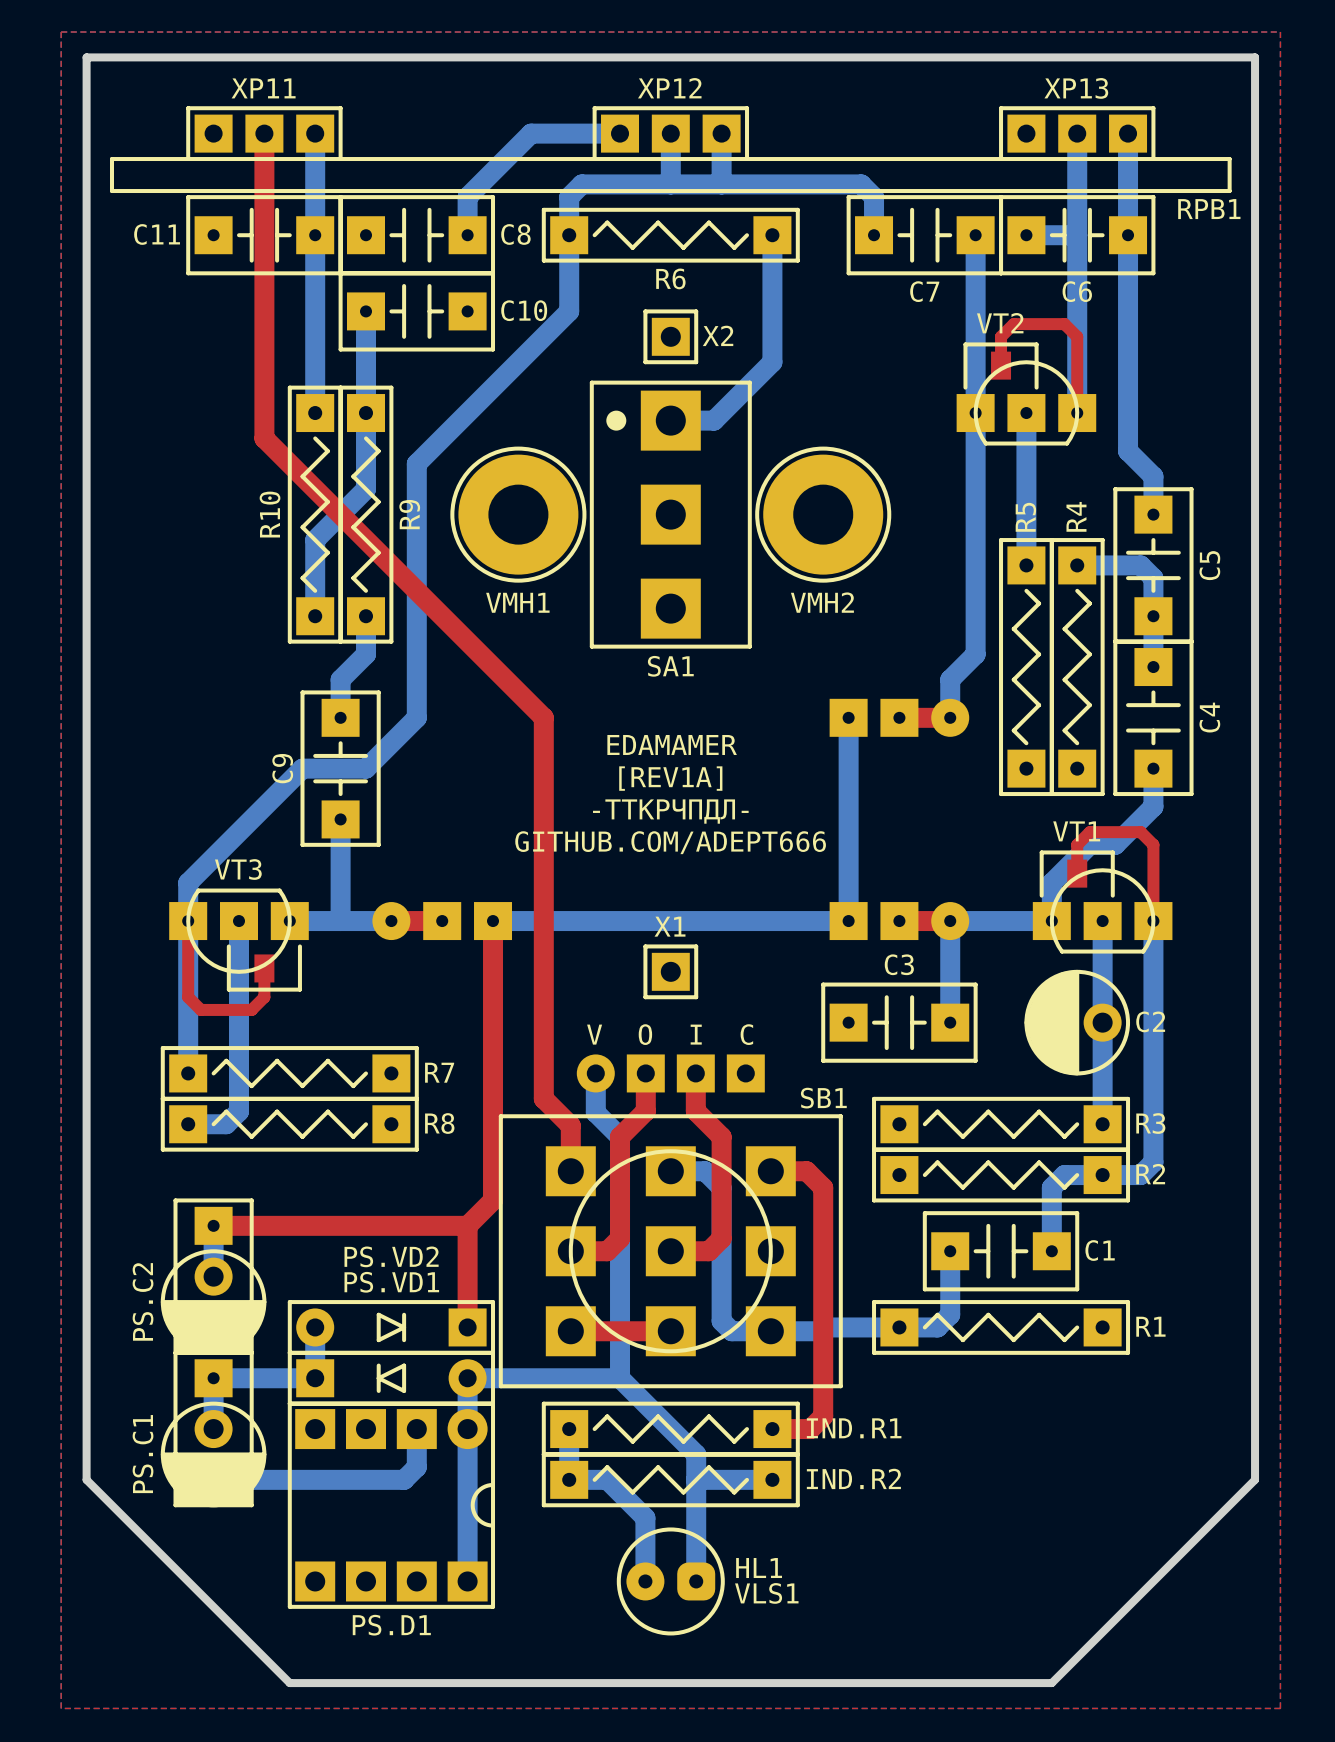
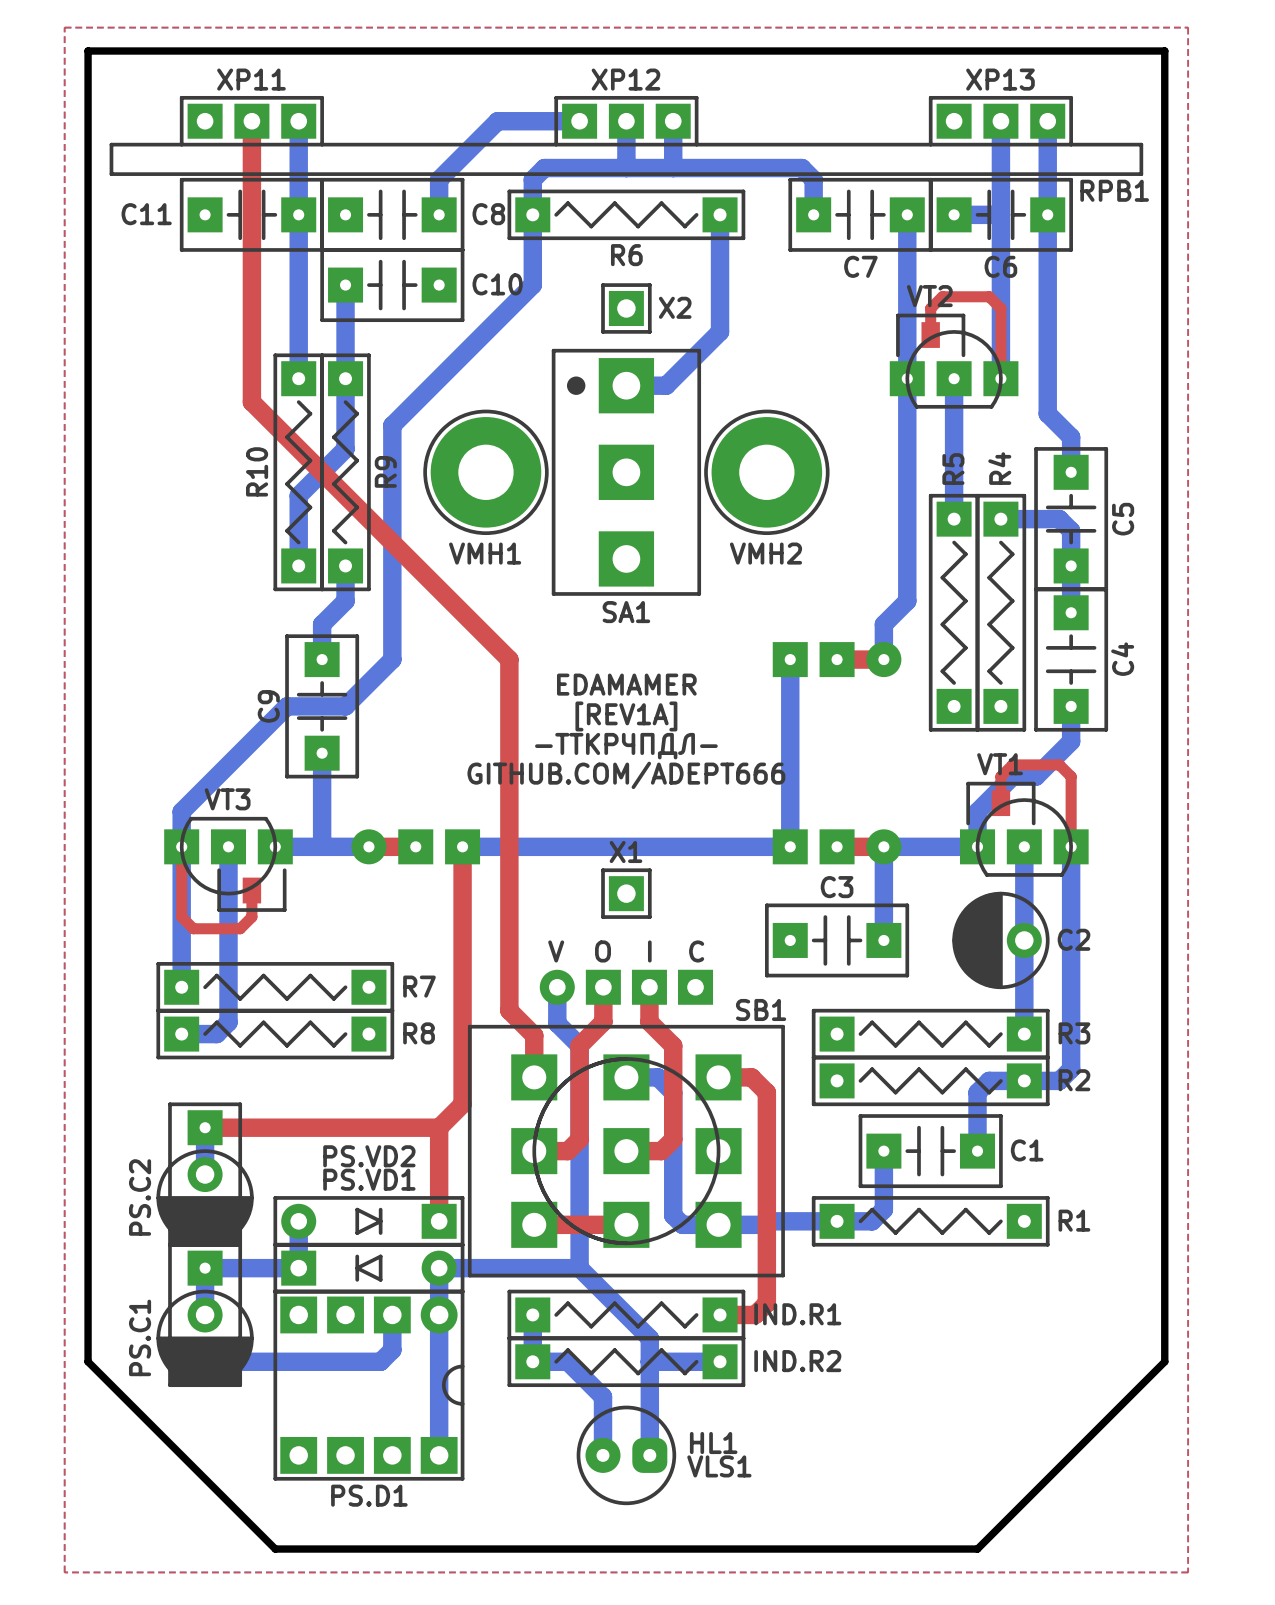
SB1 footprint: [498, 1114, 843, 1389] -> [467, 1024, 785, 1278]

